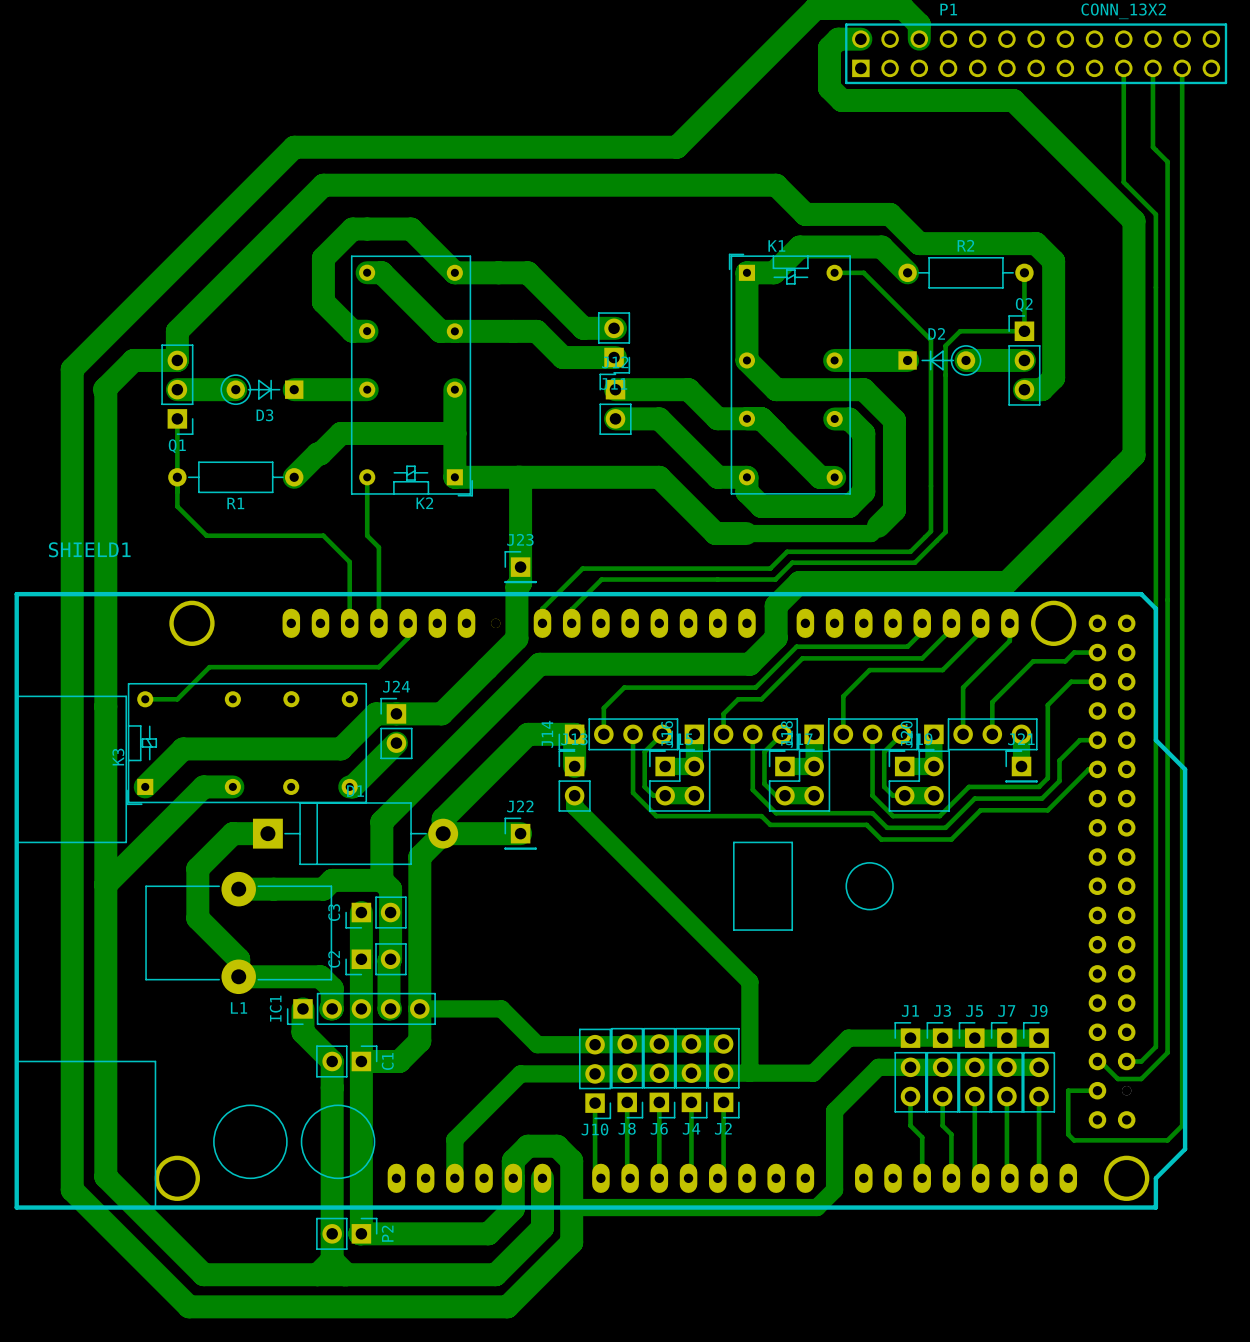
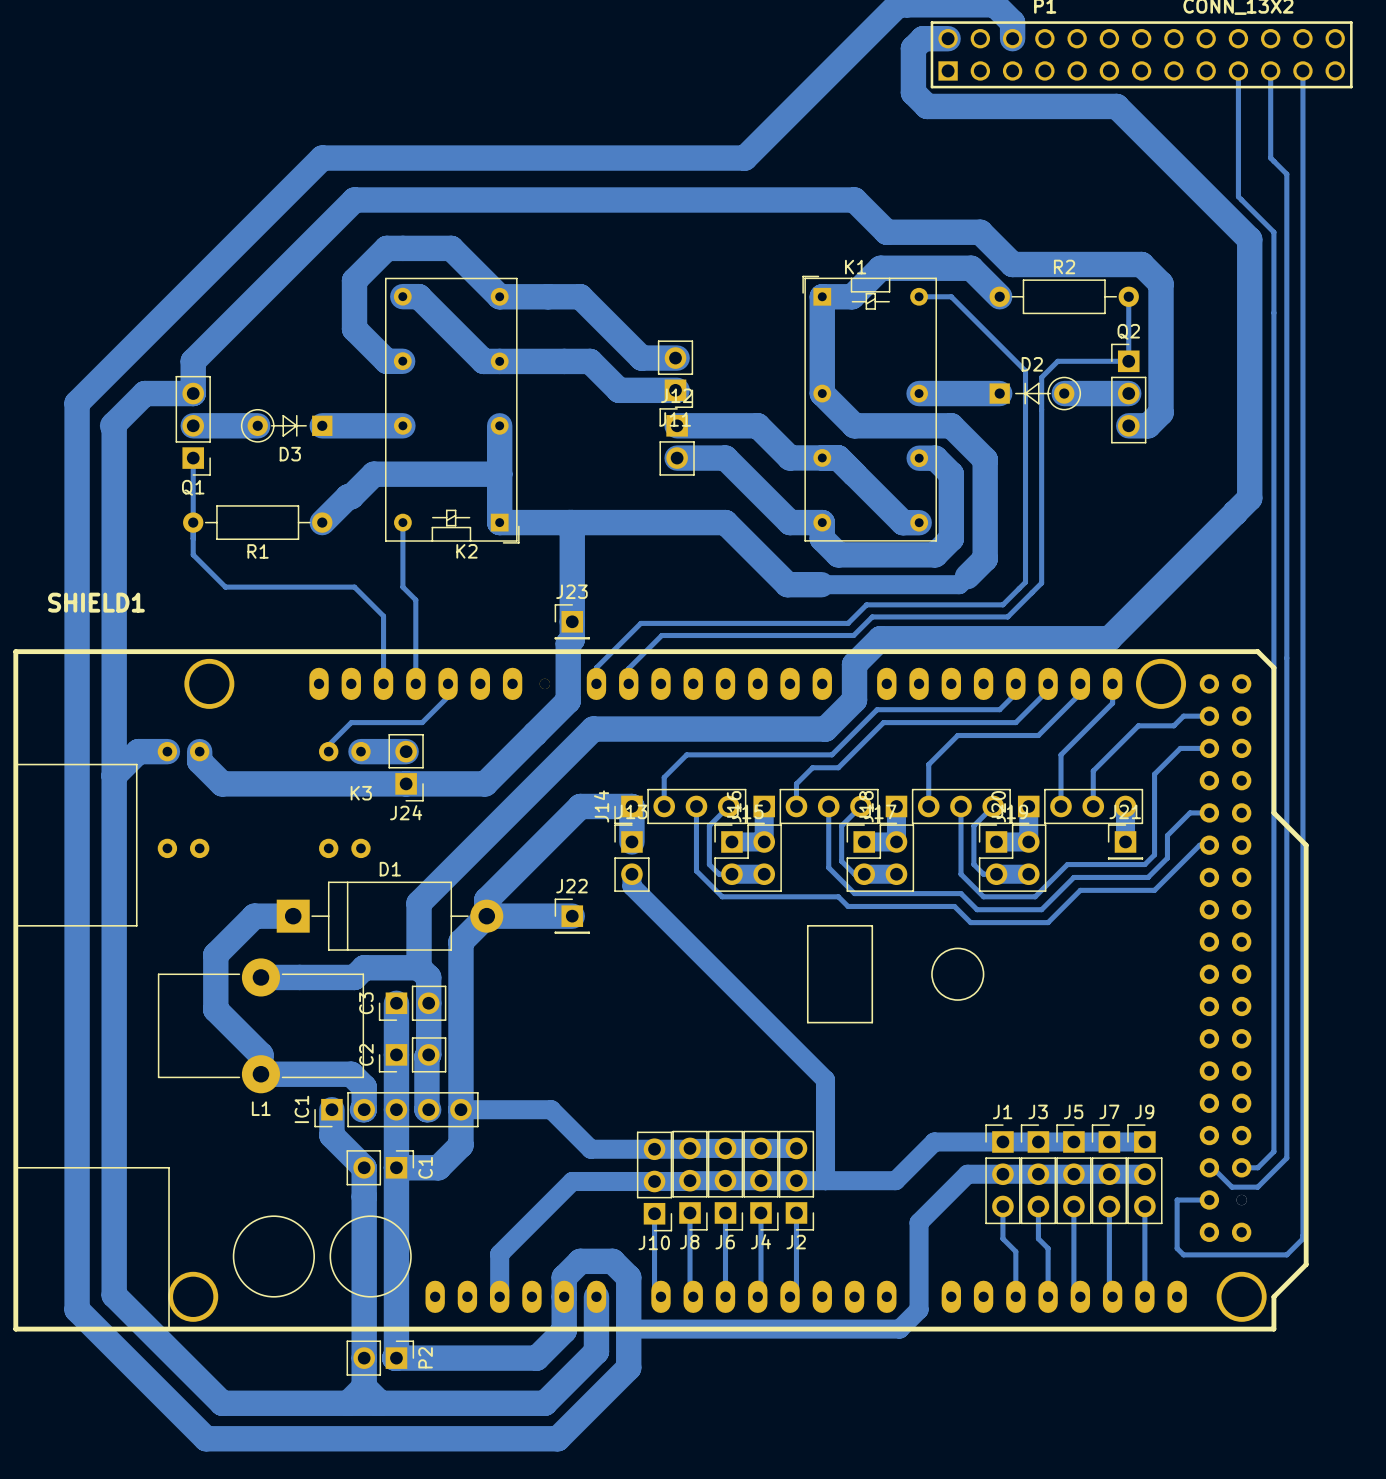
bottom track: (408, 635) (408, 637) (378, 667) (209, 667) (177, 699) (145, 699) -> (448, 696) (422, 722) (351, 722) (328, 745) (328, 751)
K3 footprint: [126, 683, 367, 805] -> [157, 741, 371, 859]
bottom track: none -> (167, 751) (138, 751) (114, 775)
bottom track: none -> (360, 751) (406, 751)
bottom track: (376, 713) (340, 748) (183, 748) (145, 786) -> (412, 783) (222, 783) (199, 761) (199, 751)
J24 rotation: 0° (396, 728) -> 180° (406, 767)
J24 position: (396, 728) -> (406, 767)
bottom track: (396, 743) (352, 786) (349, 786) -> none
K3 name position: K3 (118, 757) -> K3 (361, 793)
bottom track: (232, 786) (203, 786) (105, 884) -> none

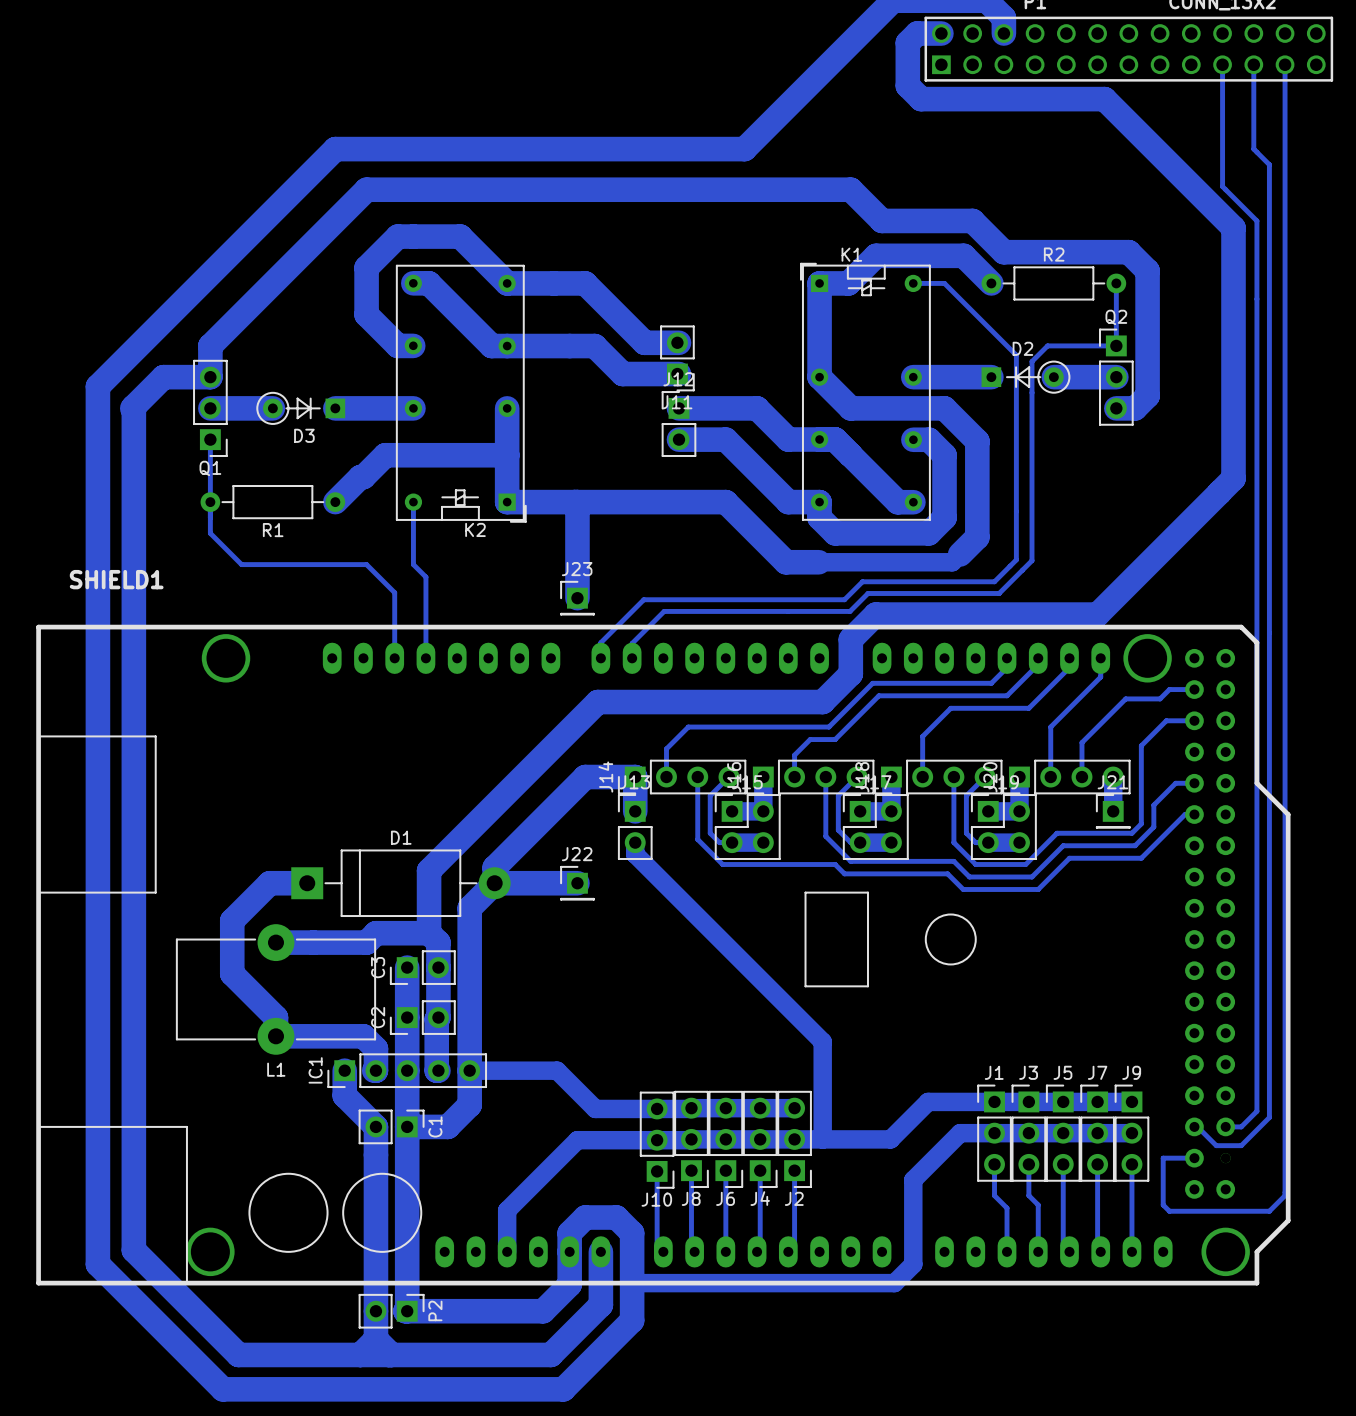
bottom track: (572, 621) (572, 639) (568, 643) (568, 700) (485, 783) (222, 783) (199, 761) (199, 751) -> none
SHIELD1 footprint: [13, 649, 1309, 1332] -> [36, 624, 1291, 1286]
bottom track: (448, 683) (448, 696) (422, 722) (351, 722) (328, 745) (328, 751) -> none
bottom track: (167, 751) (138, 751) (114, 775) -> none
bottom track: (360, 751) (406, 751) -> none
J24: (406, 767) -> none
K3: (264, 800) -> none

